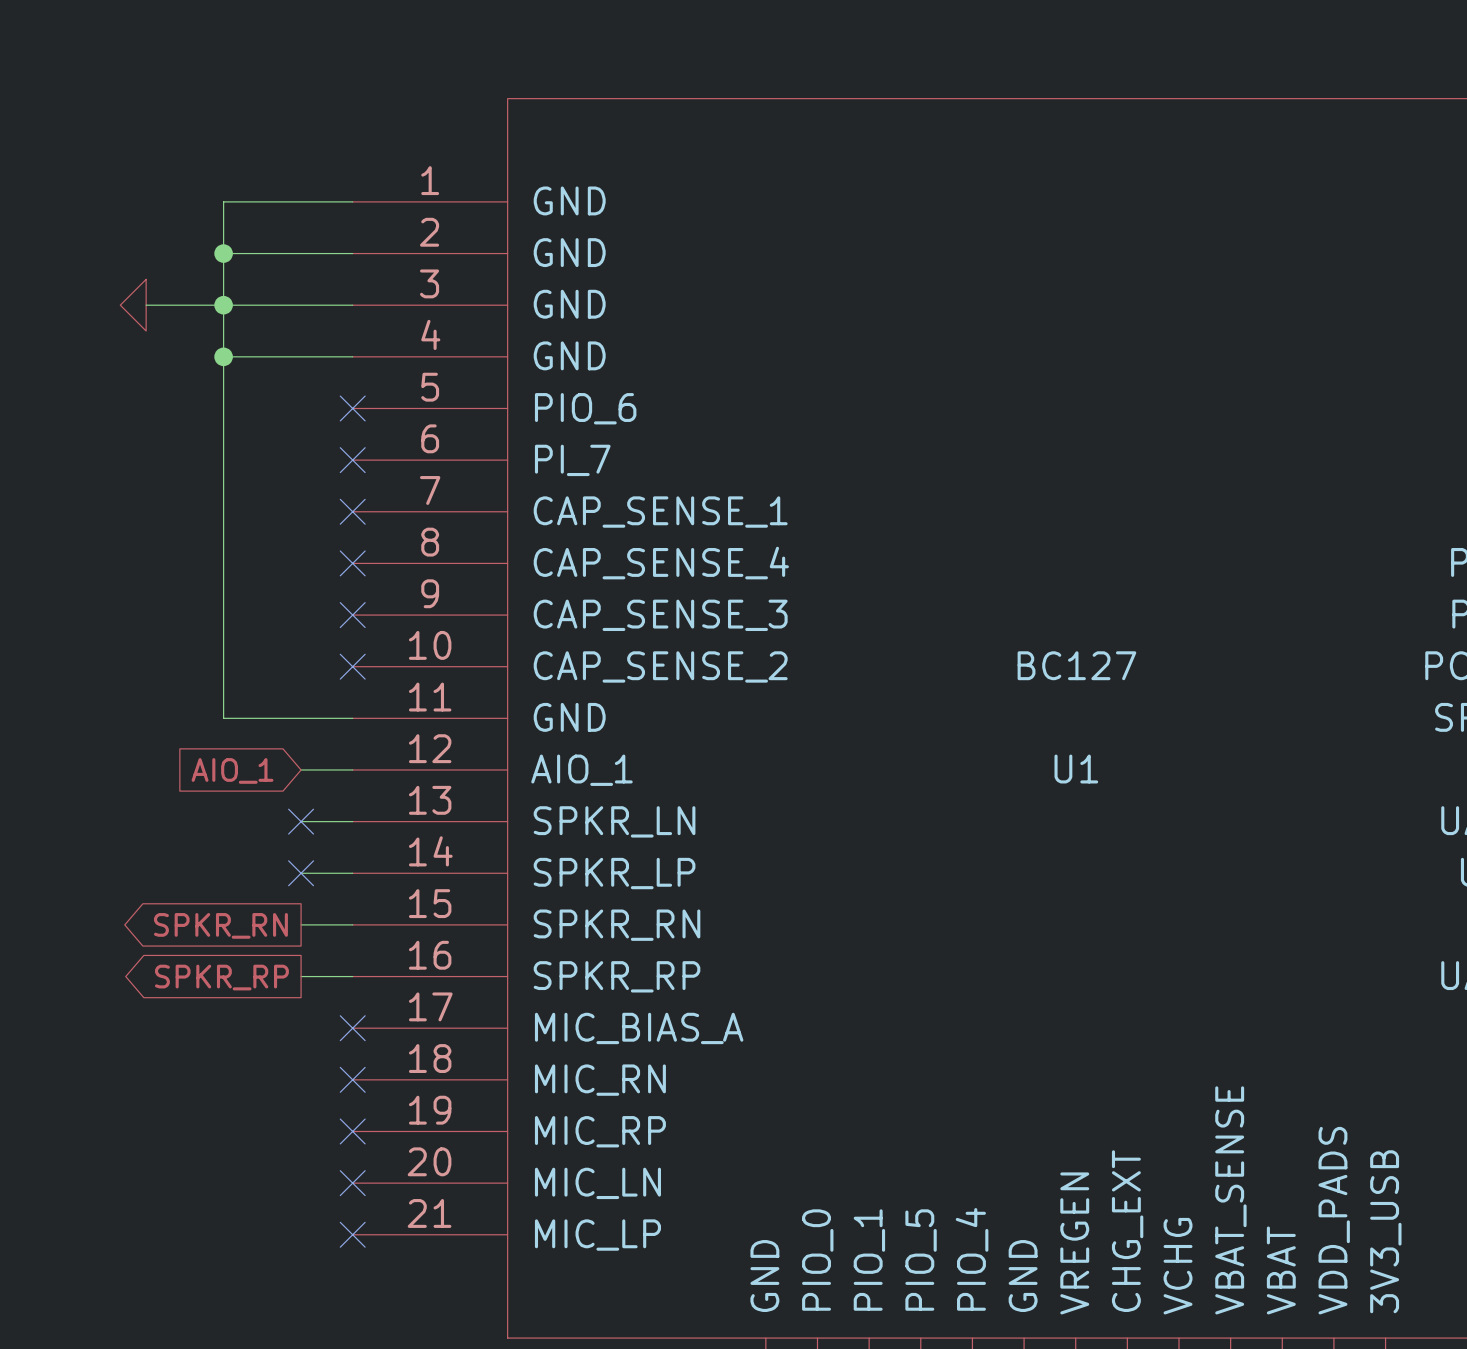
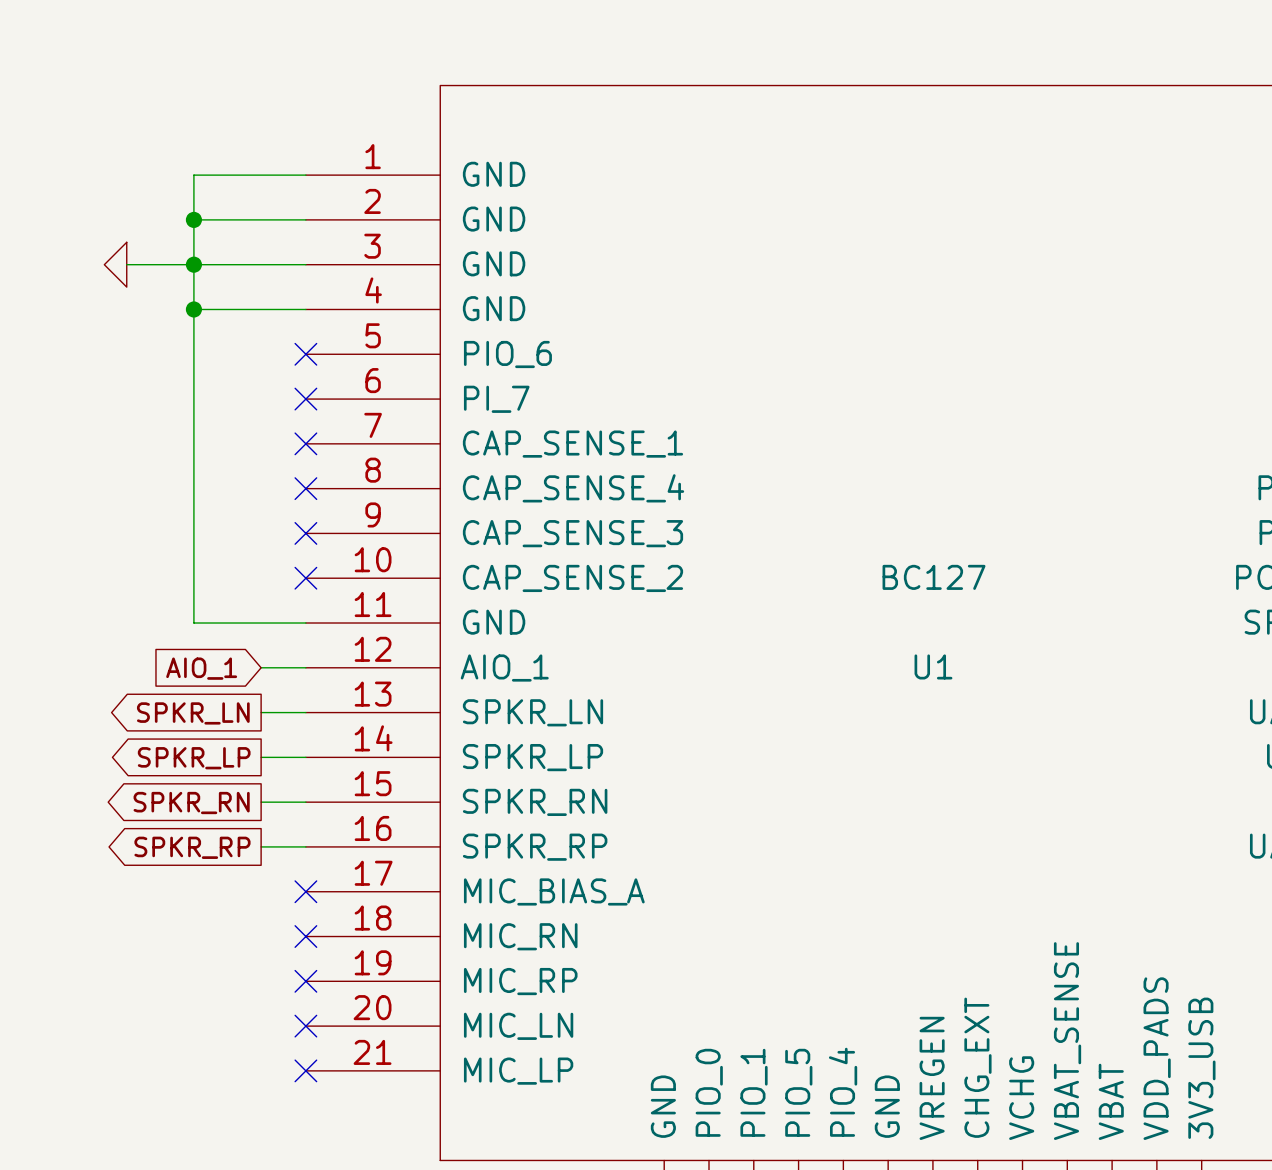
no-connect mark: (301, 821) -> none
global label: none -> SPKR_LN (193, 713)
no-connect mark: (301, 873) -> none
global label: none -> SPKR_LP (194, 758)

